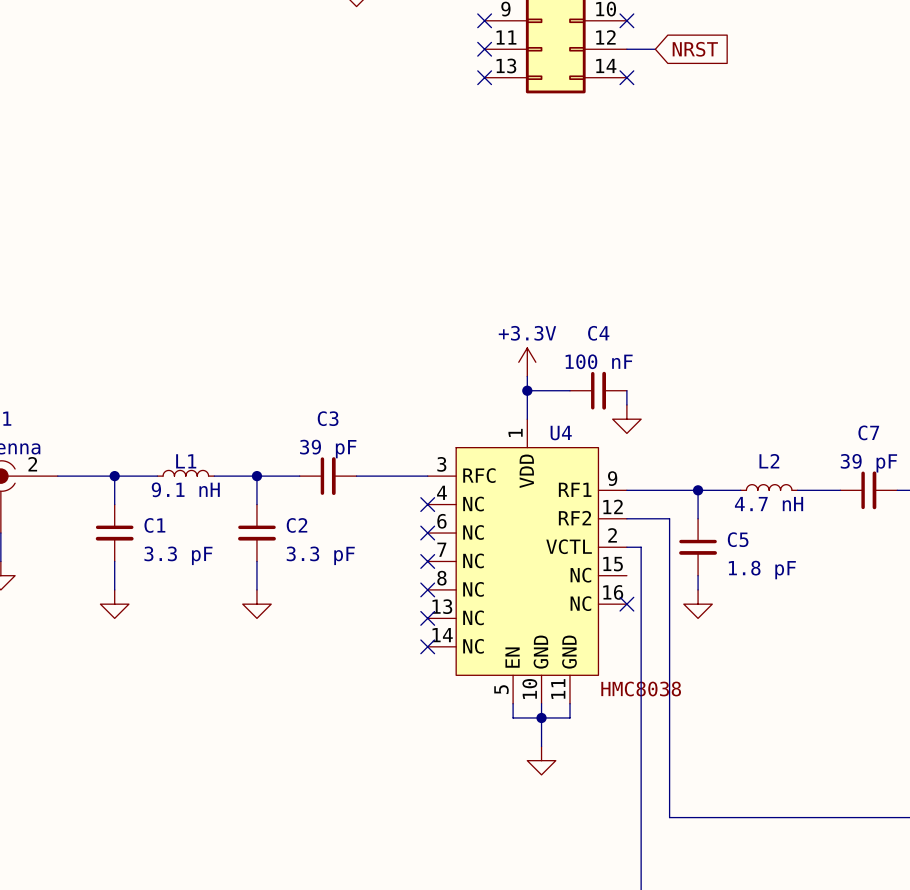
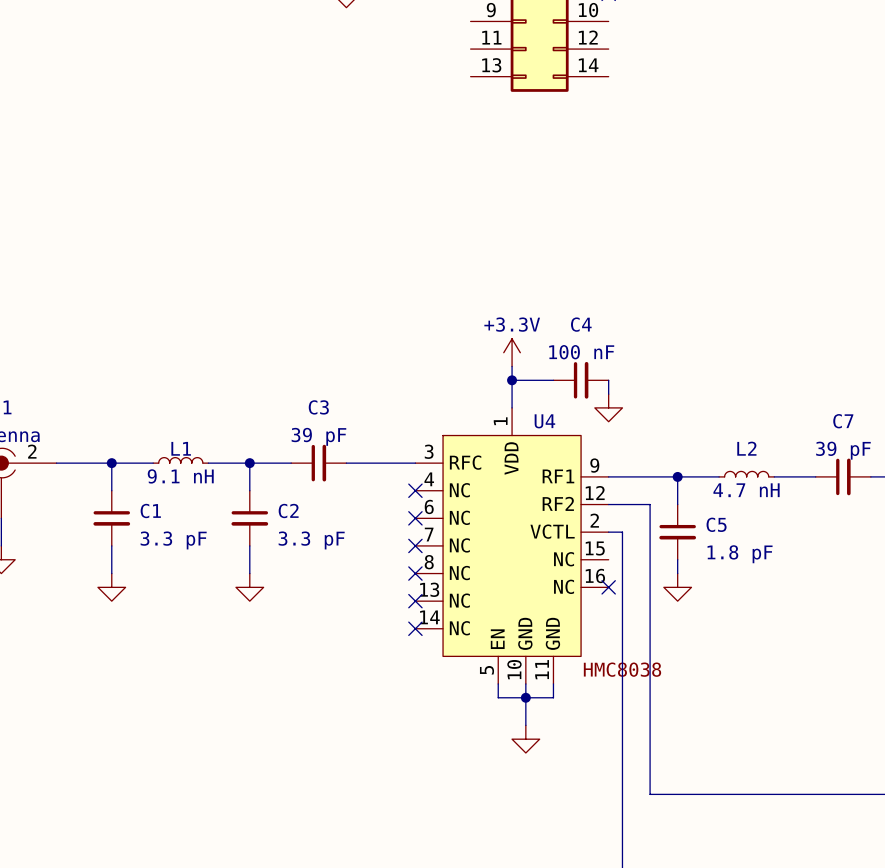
no-connect mark: (484, 20) -> none
no-connect mark: (626, 20) -> none
no-connect mark: (484, 49) -> none
wire: (626, 49) (655, 49) -> none
global label: NRST (695, 49) -> none
no-connect mark: (484, 77) -> none
no-connect mark: (626, 77) -> none

